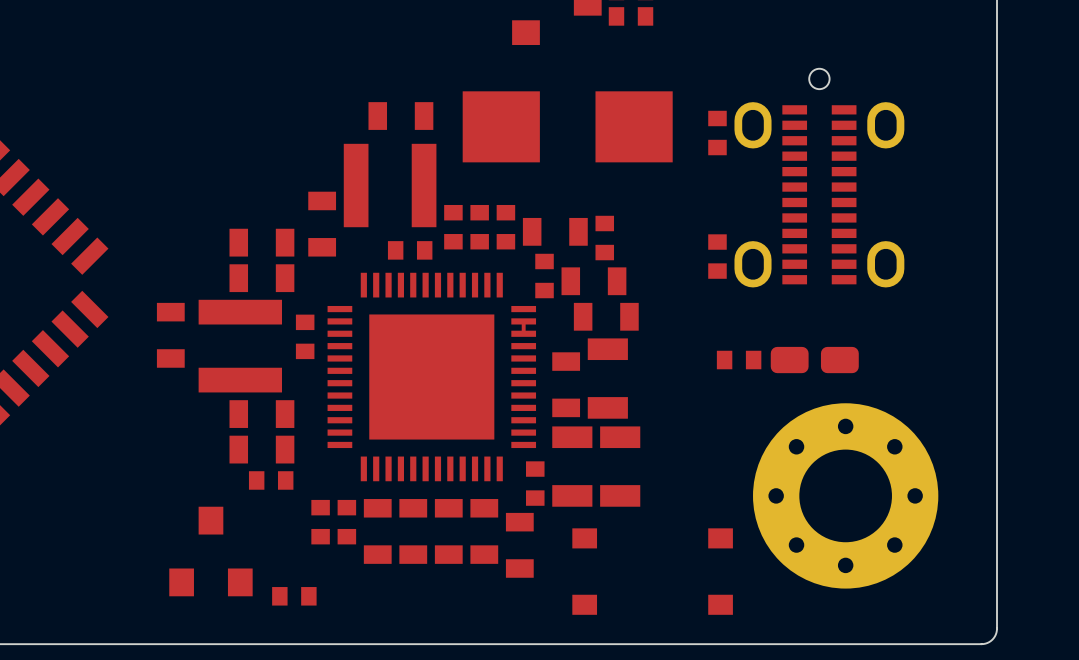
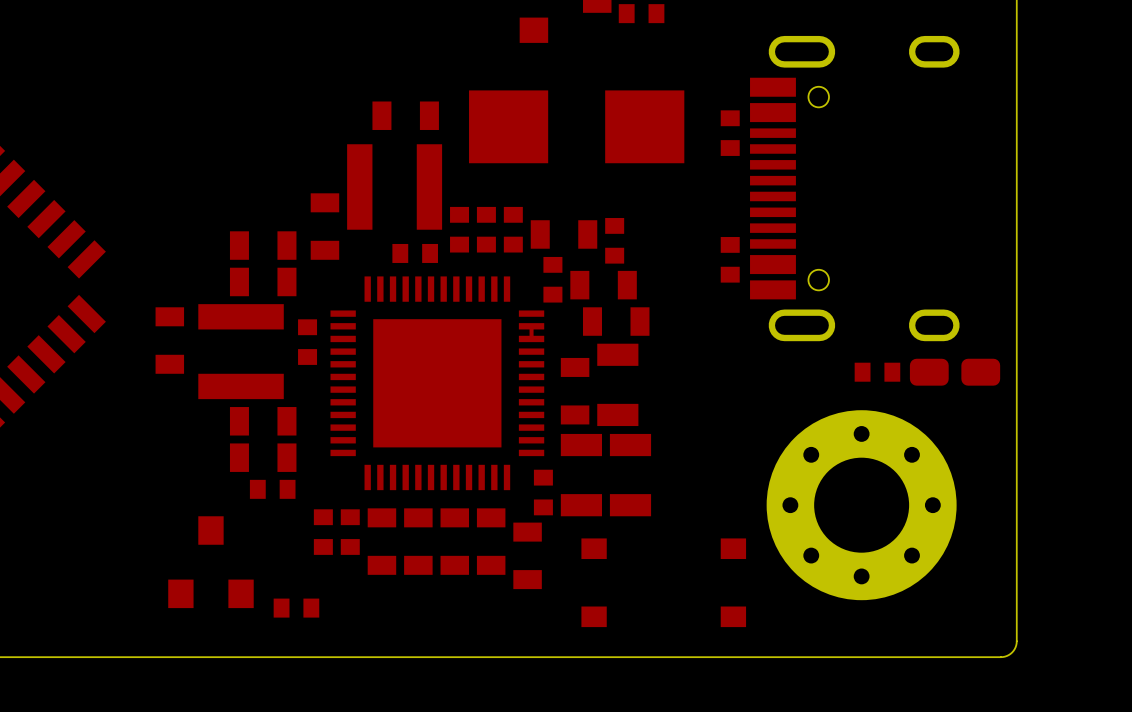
part footprint: [734, 68, 905, 327] -> [750, 35, 960, 342]
part position: (739, 360) -> (877, 372)
part position: (814, 360) -> (955, 372)

